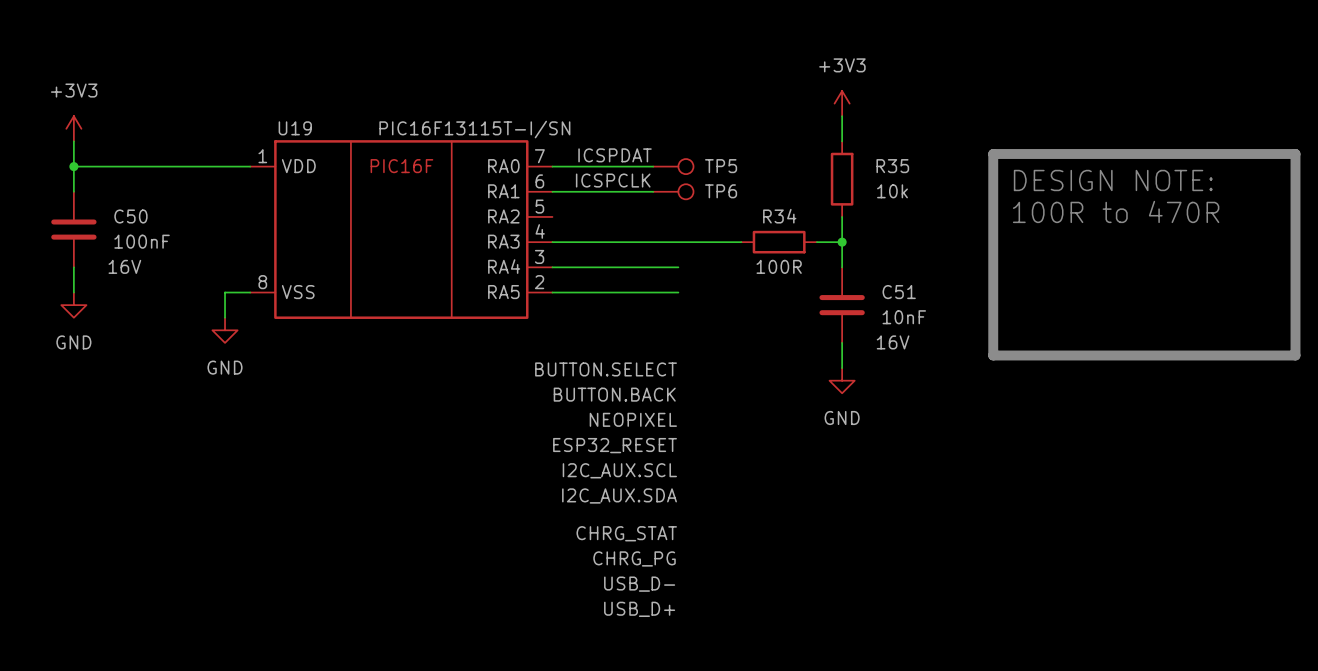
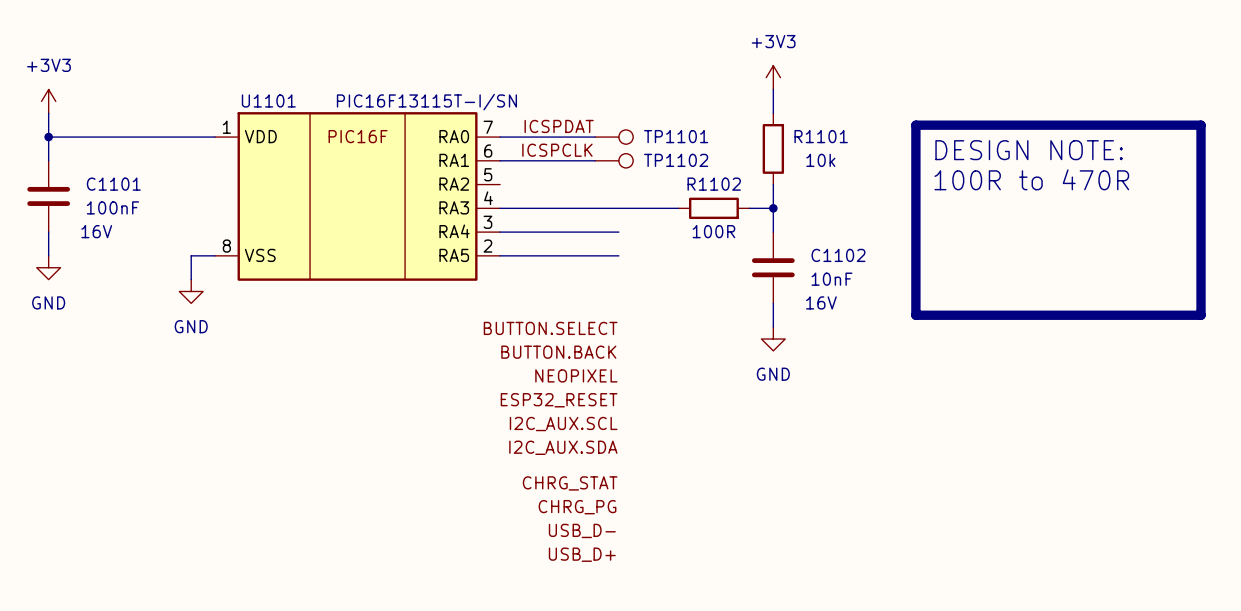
U19 name: U19 (295, 128) -> U1101 (268, 100)
TP5 name: TP5 (721, 166) -> TP1101 (676, 136)
R35 name: R35 (892, 166) -> R1101 (821, 136)
TP6 name: TP6 (721, 191) -> TP1102 (676, 160)
C50 name: C50 (130, 216) -> C1101 (113, 184)
R34 name: R34 (779, 216) -> R1102 (714, 184)
C51 name: C51 (899, 292) -> C1102 (838, 255)

